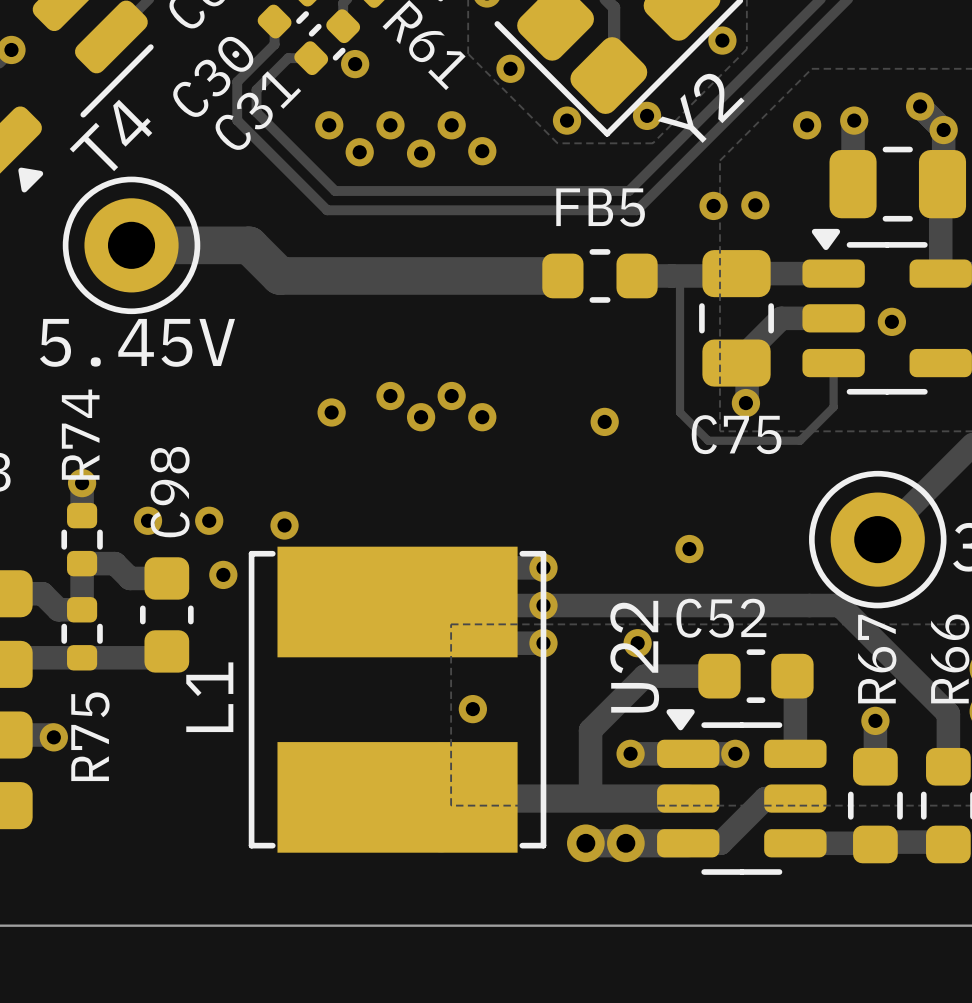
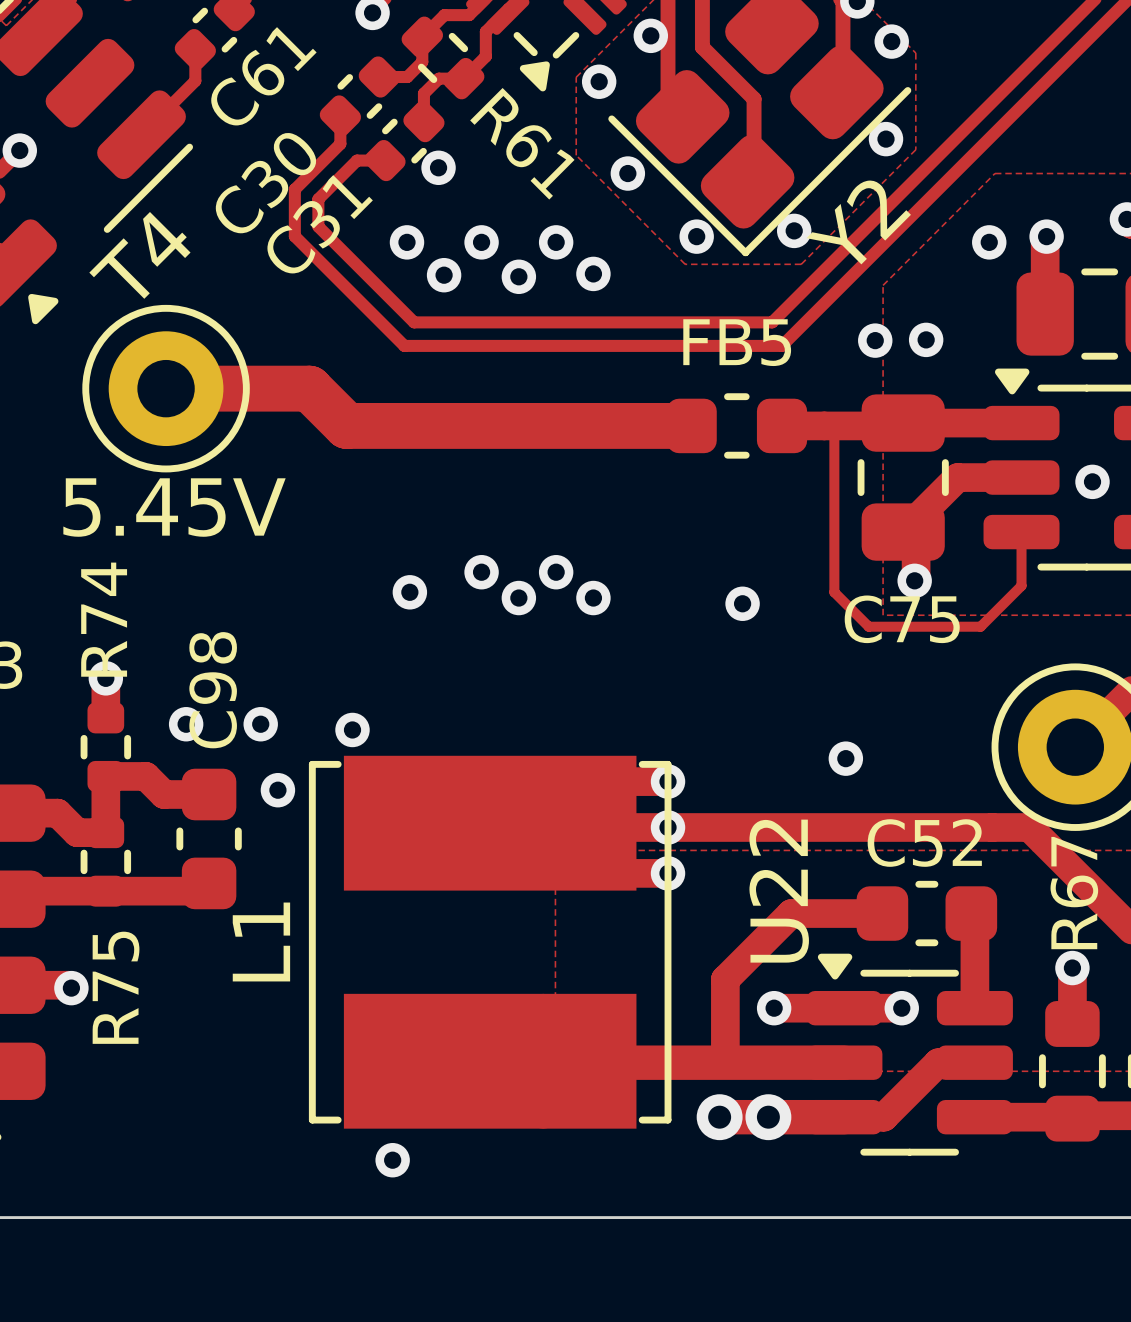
C52 name position: C52 (721, 618) -> C52 (924, 843)
via: (637, 643) -> none
via: (472, 709) -> none
via: none -> (392, 1160)

